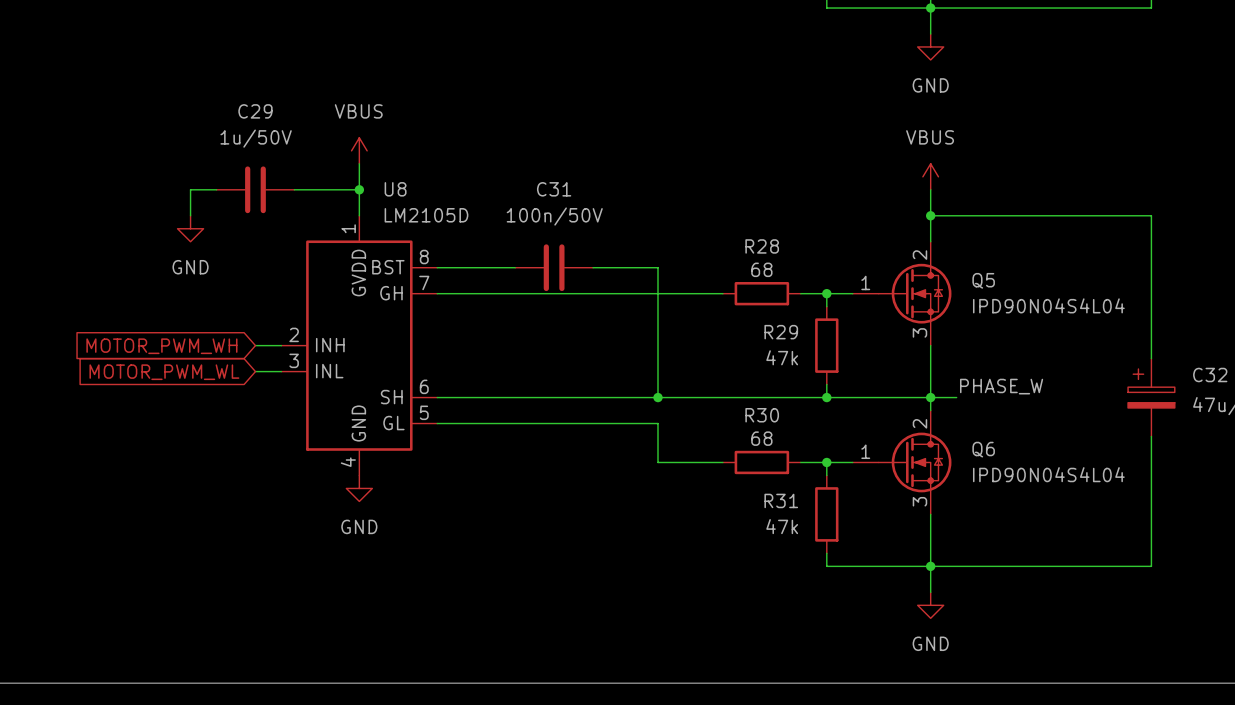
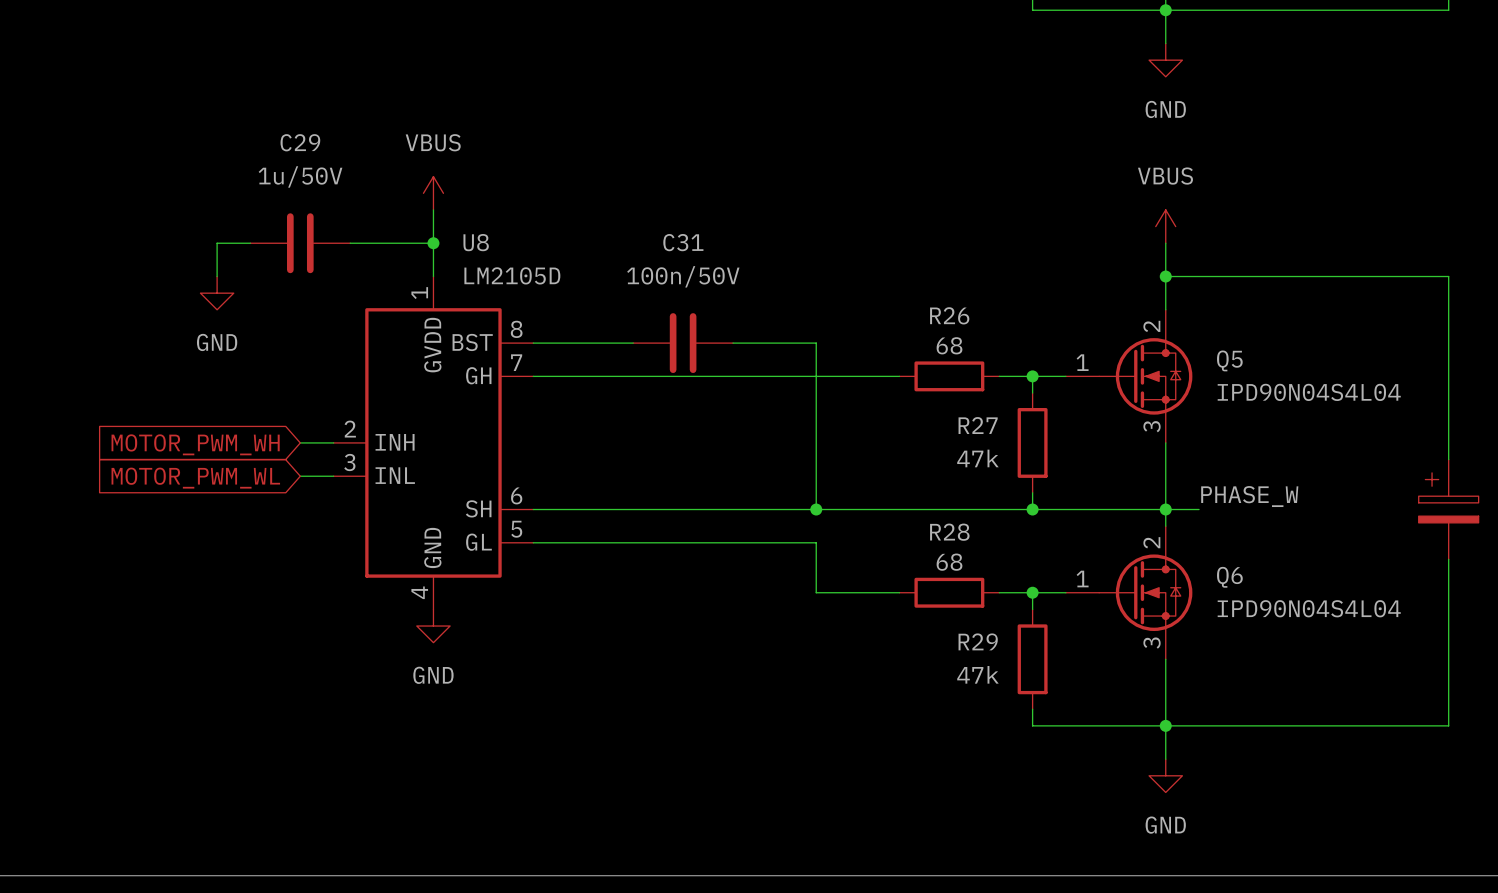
R28 name: R28 (762, 246) -> R26 (949, 315)
R29 name: R29 (781, 332) -> R27 (978, 425)
R30 name: R30 (762, 415) -> R28 (949, 532)
R31 name: R31 (781, 500) -> R29 (978, 641)

